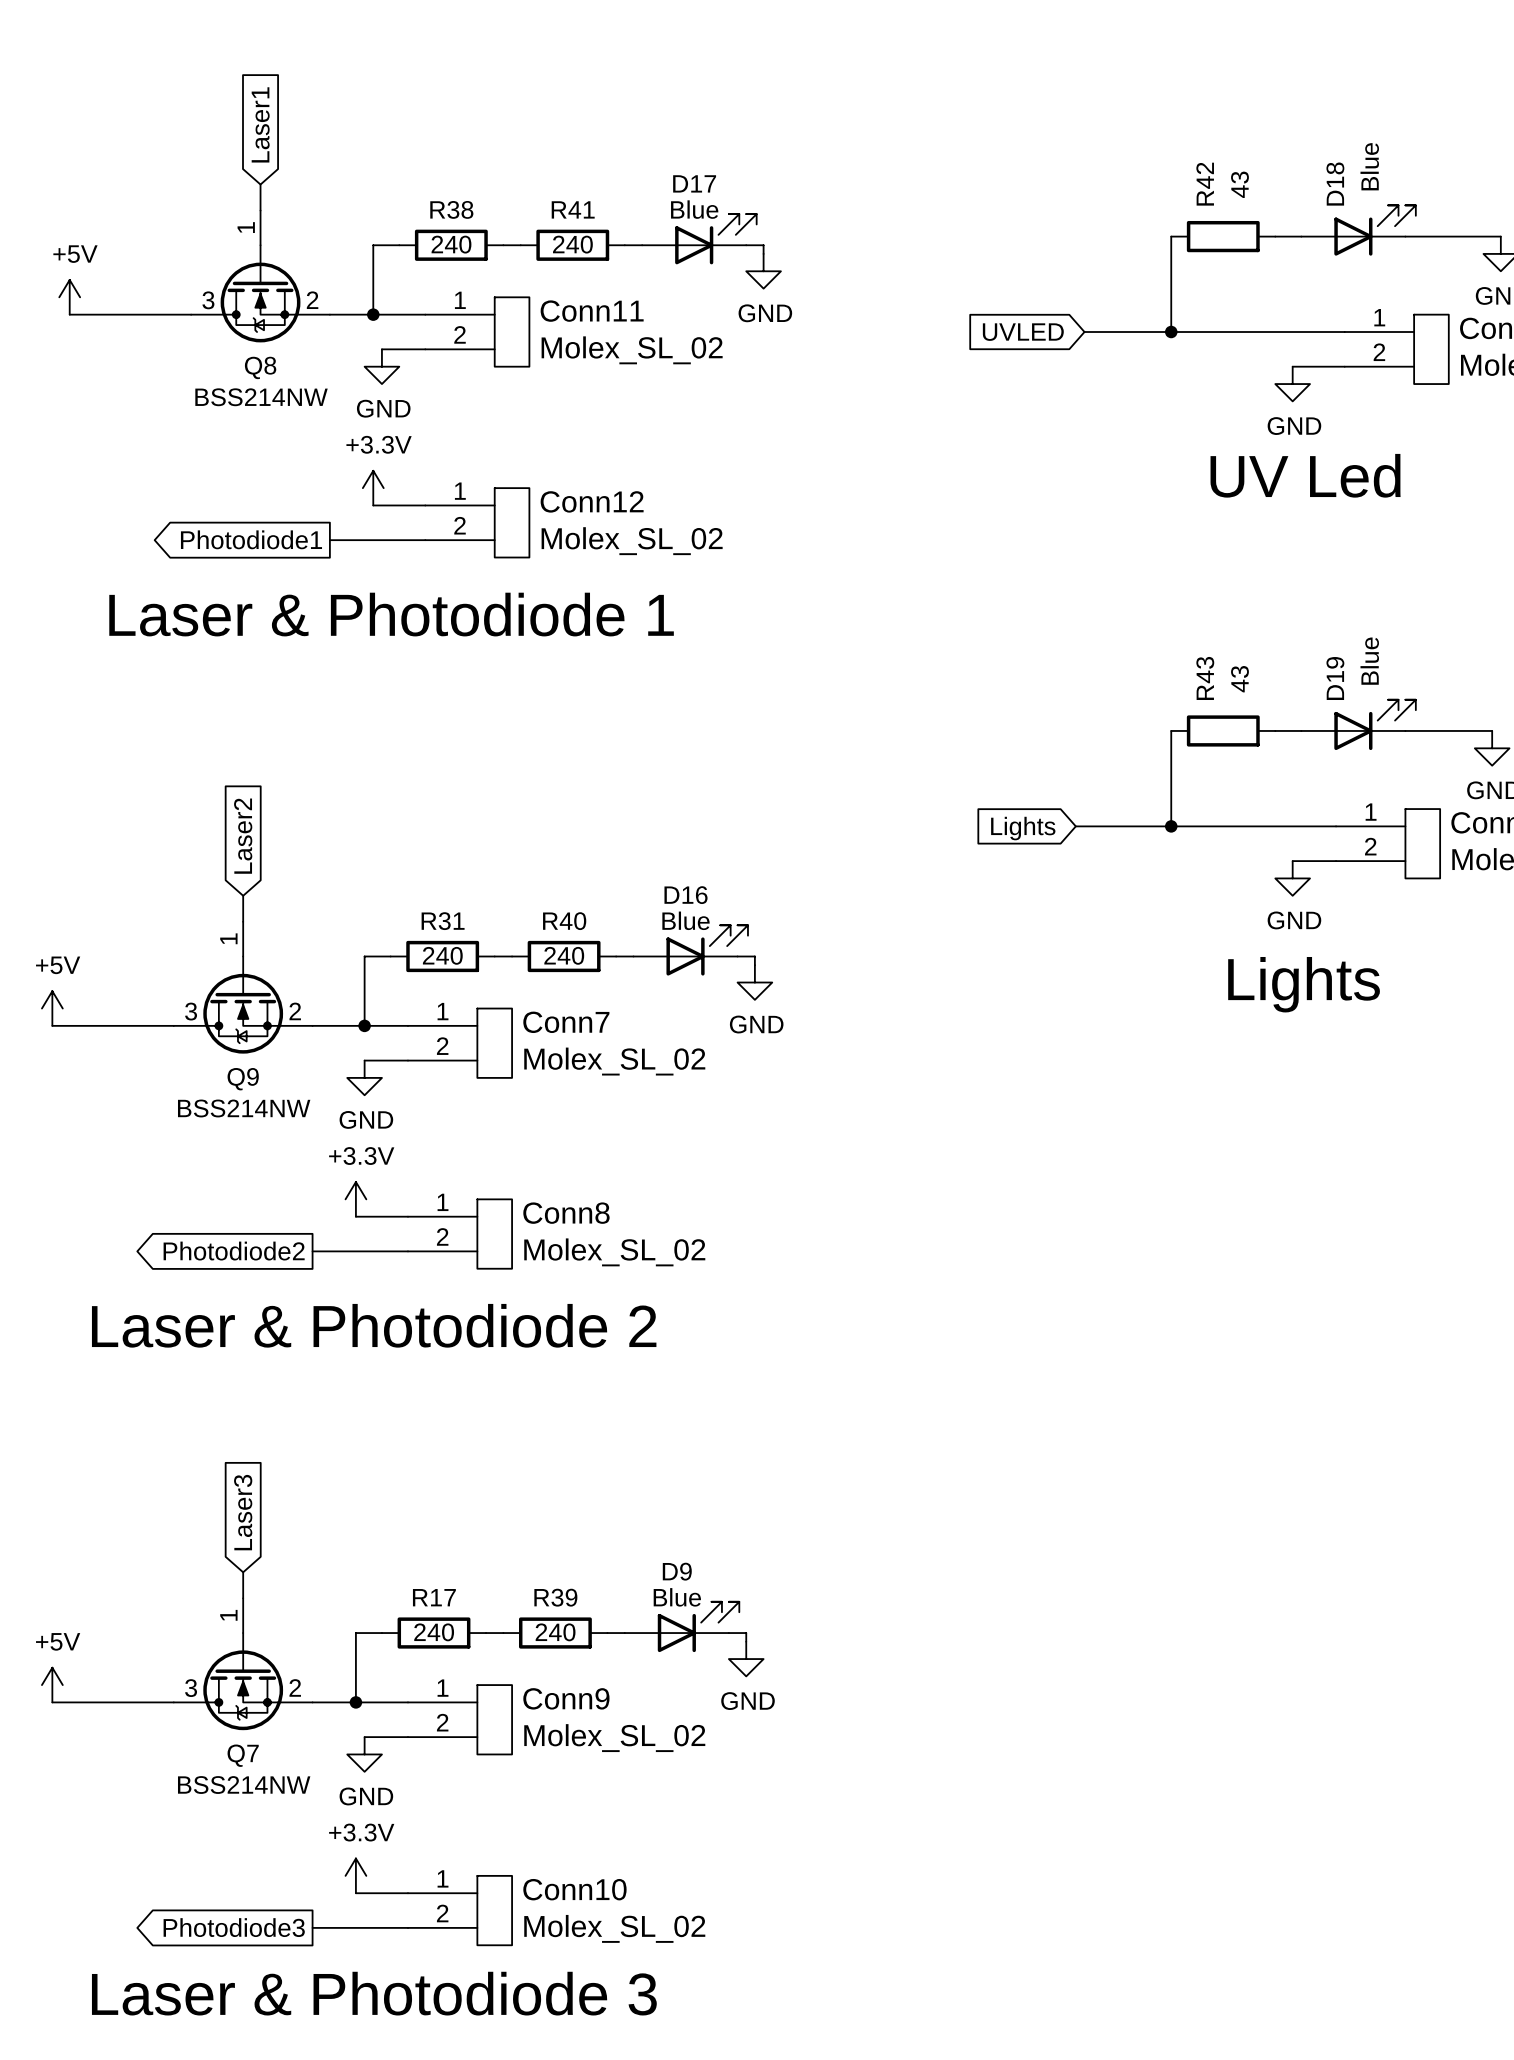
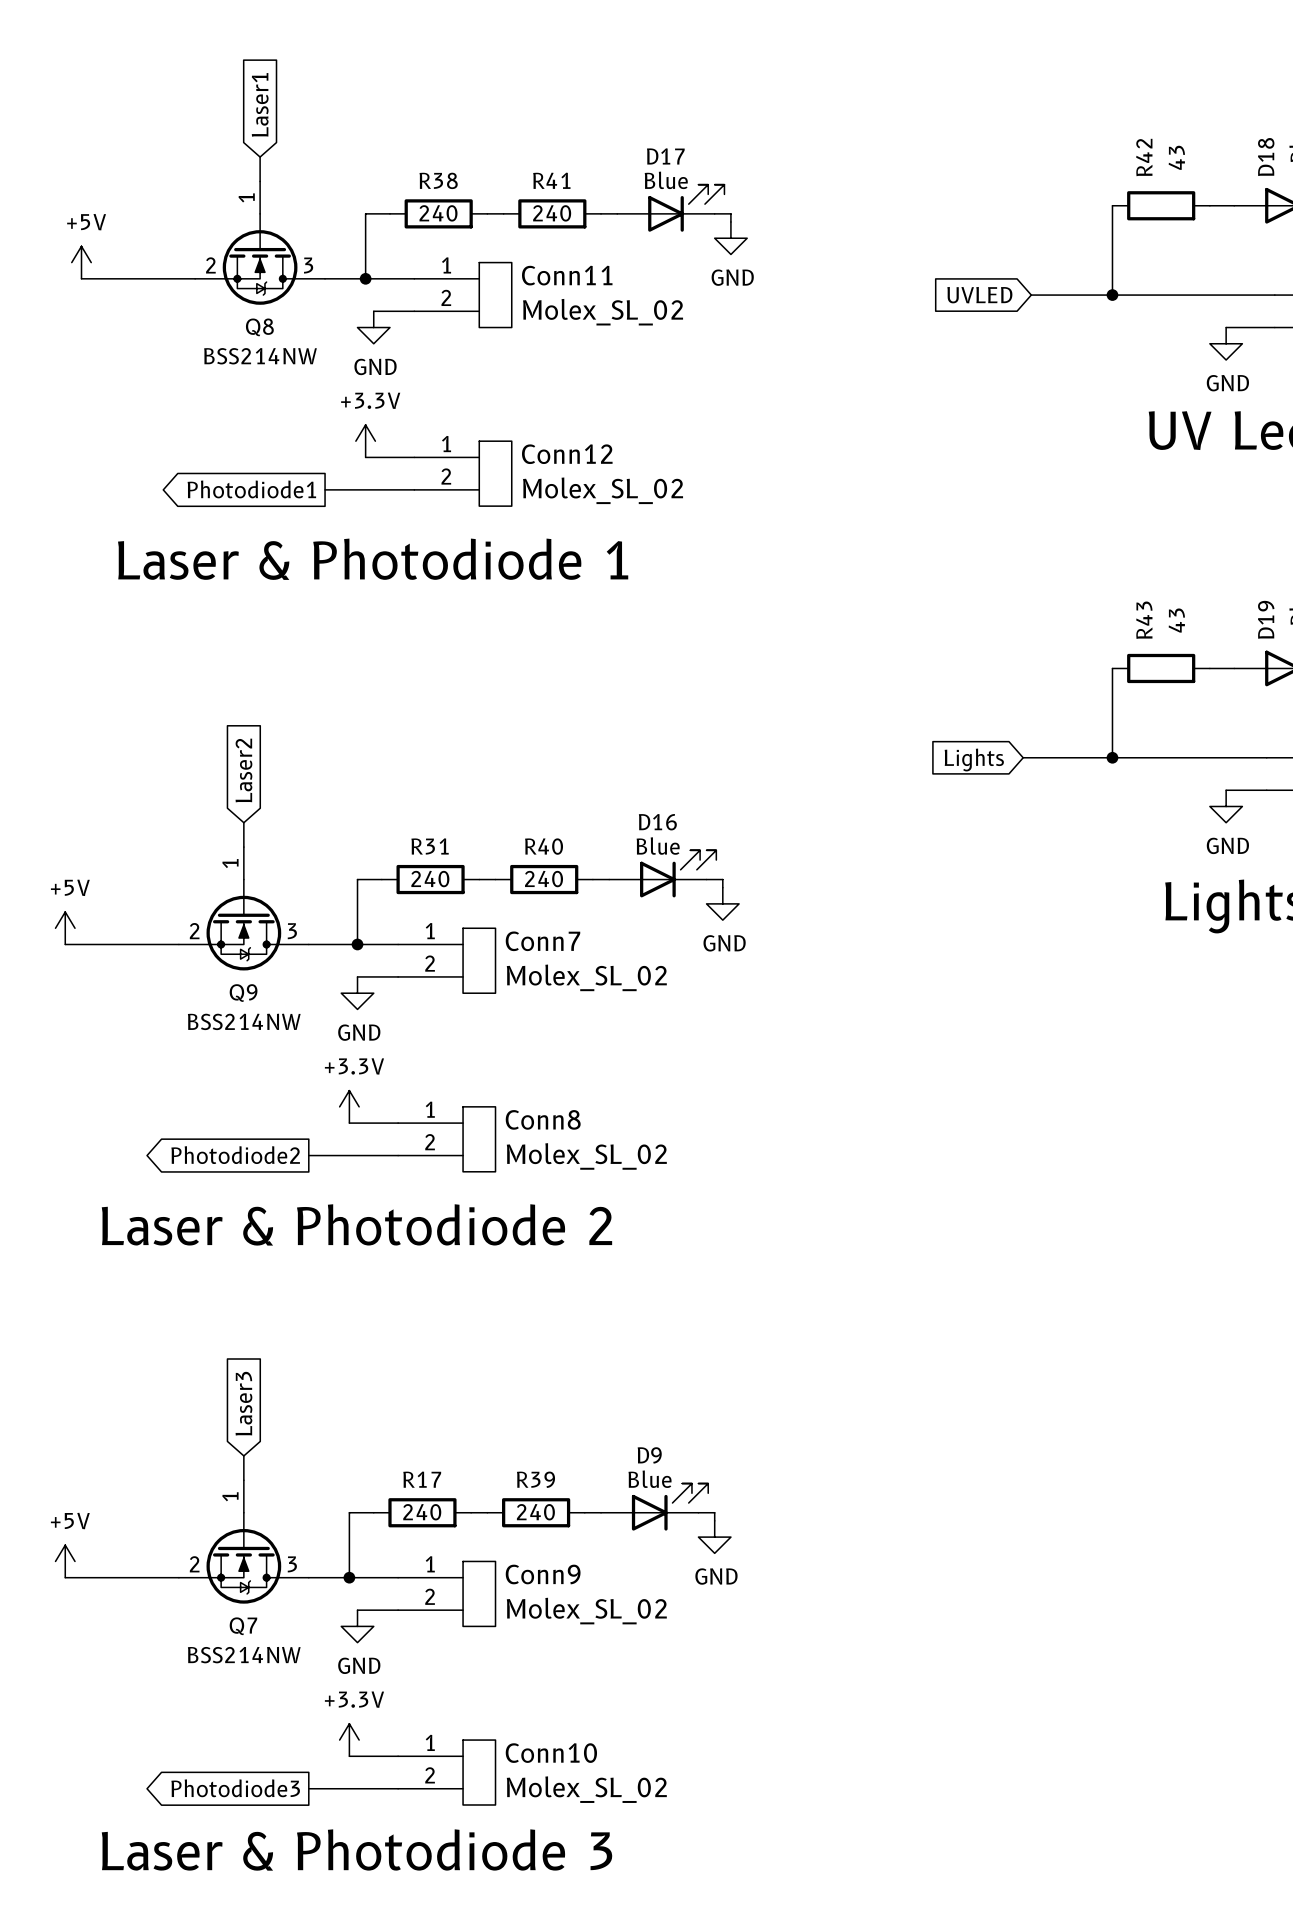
Q8 flip: as is (260, 293) -> left-right (260, 259)
Q9 flip: as is (243, 1005) -> left-right (243, 925)
Q7 flip: as is (243, 1681) -> left-right (243, 1558)

